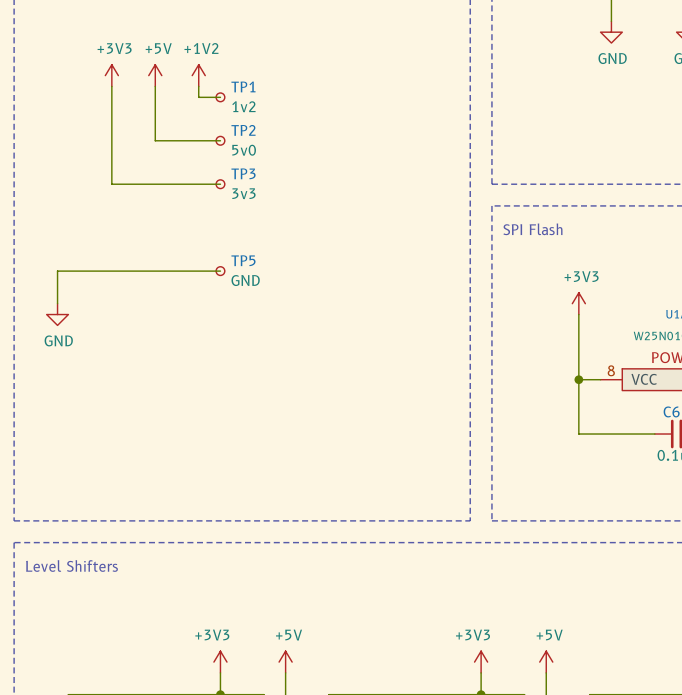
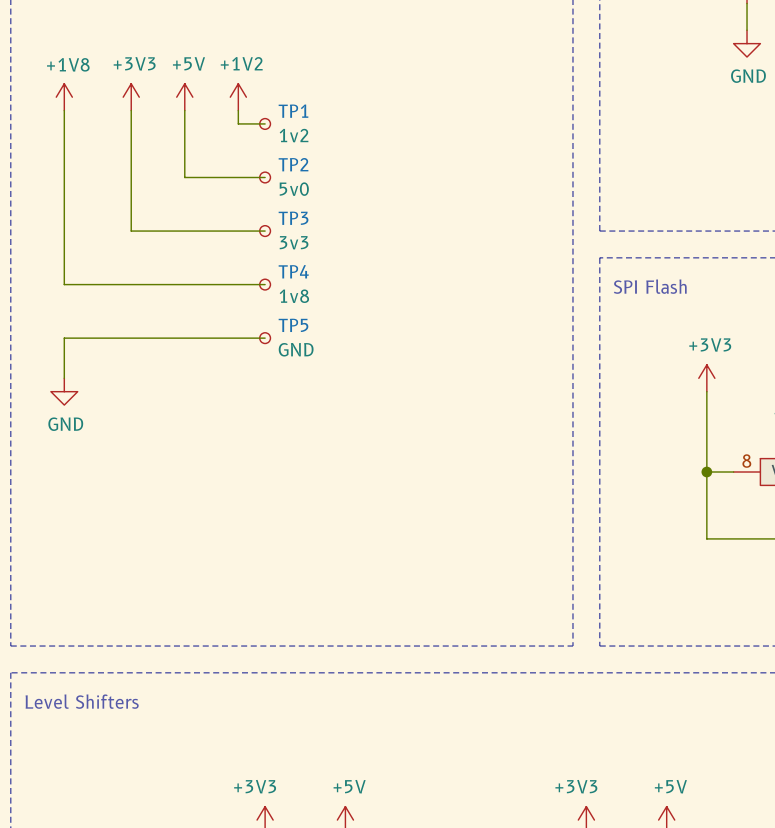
power symbol: none -> +1V8 (64, 97)
wire: none -> (64, 110) (64, 284) (265, 284)
TP4: none -> 1v8 (265, 284)

